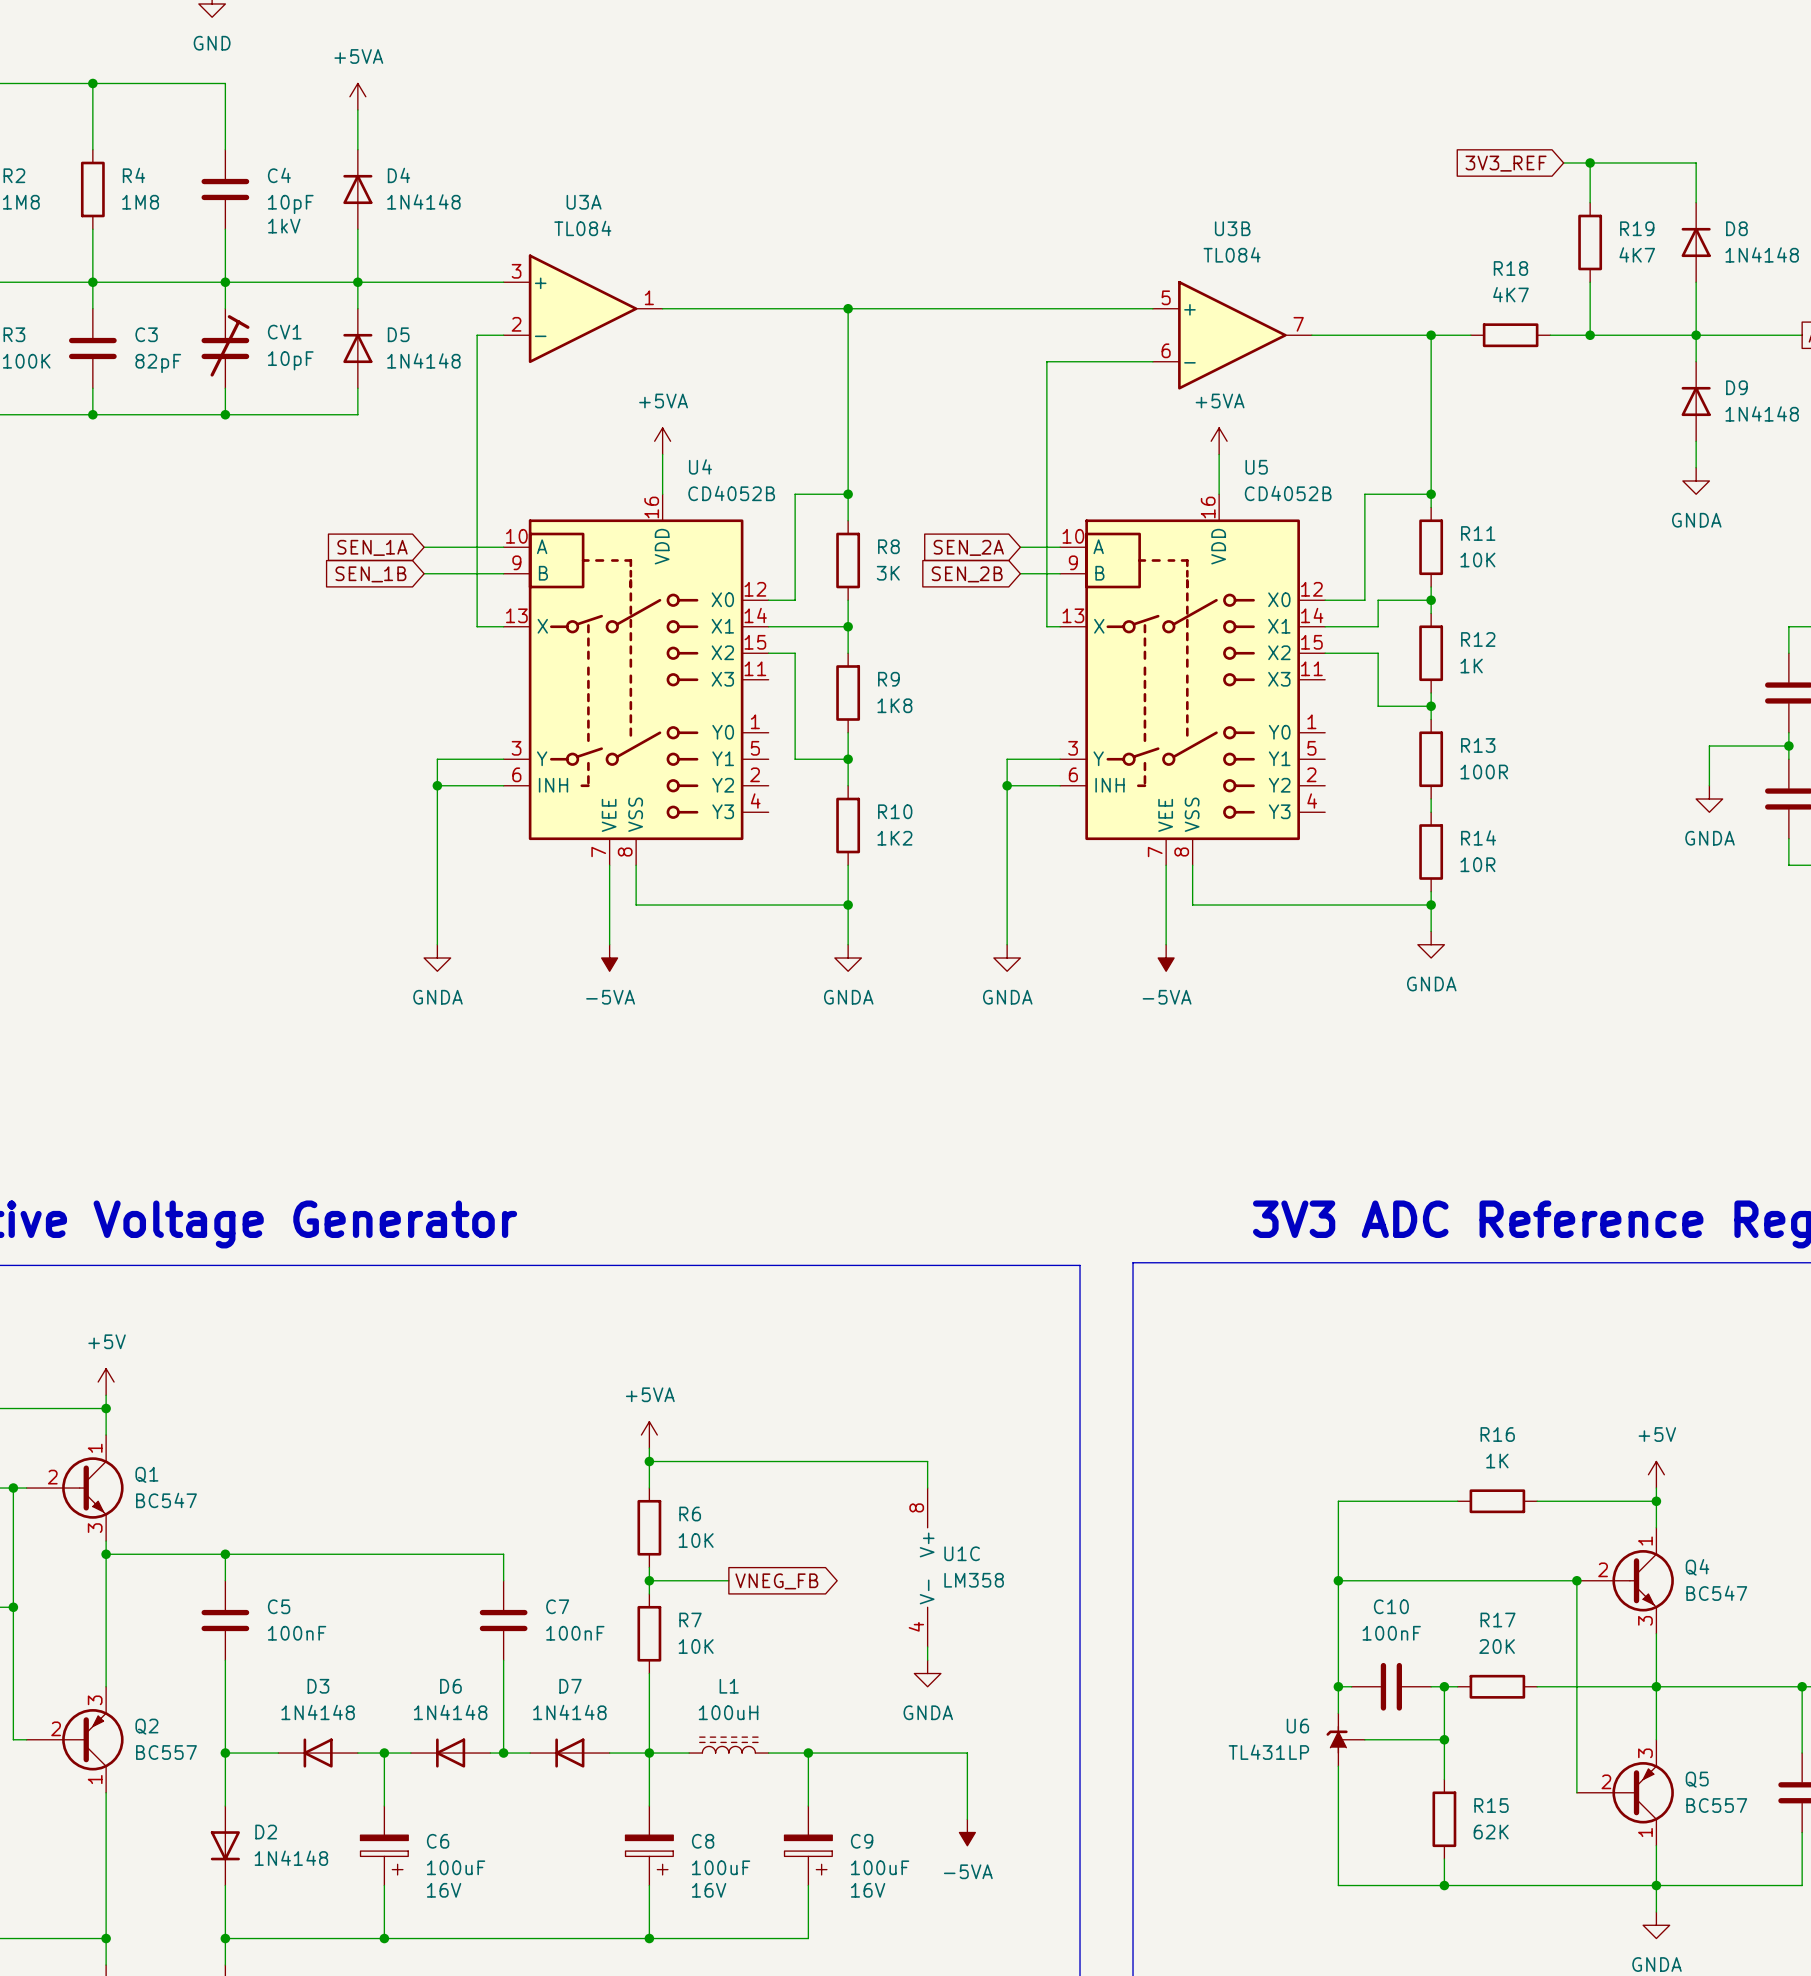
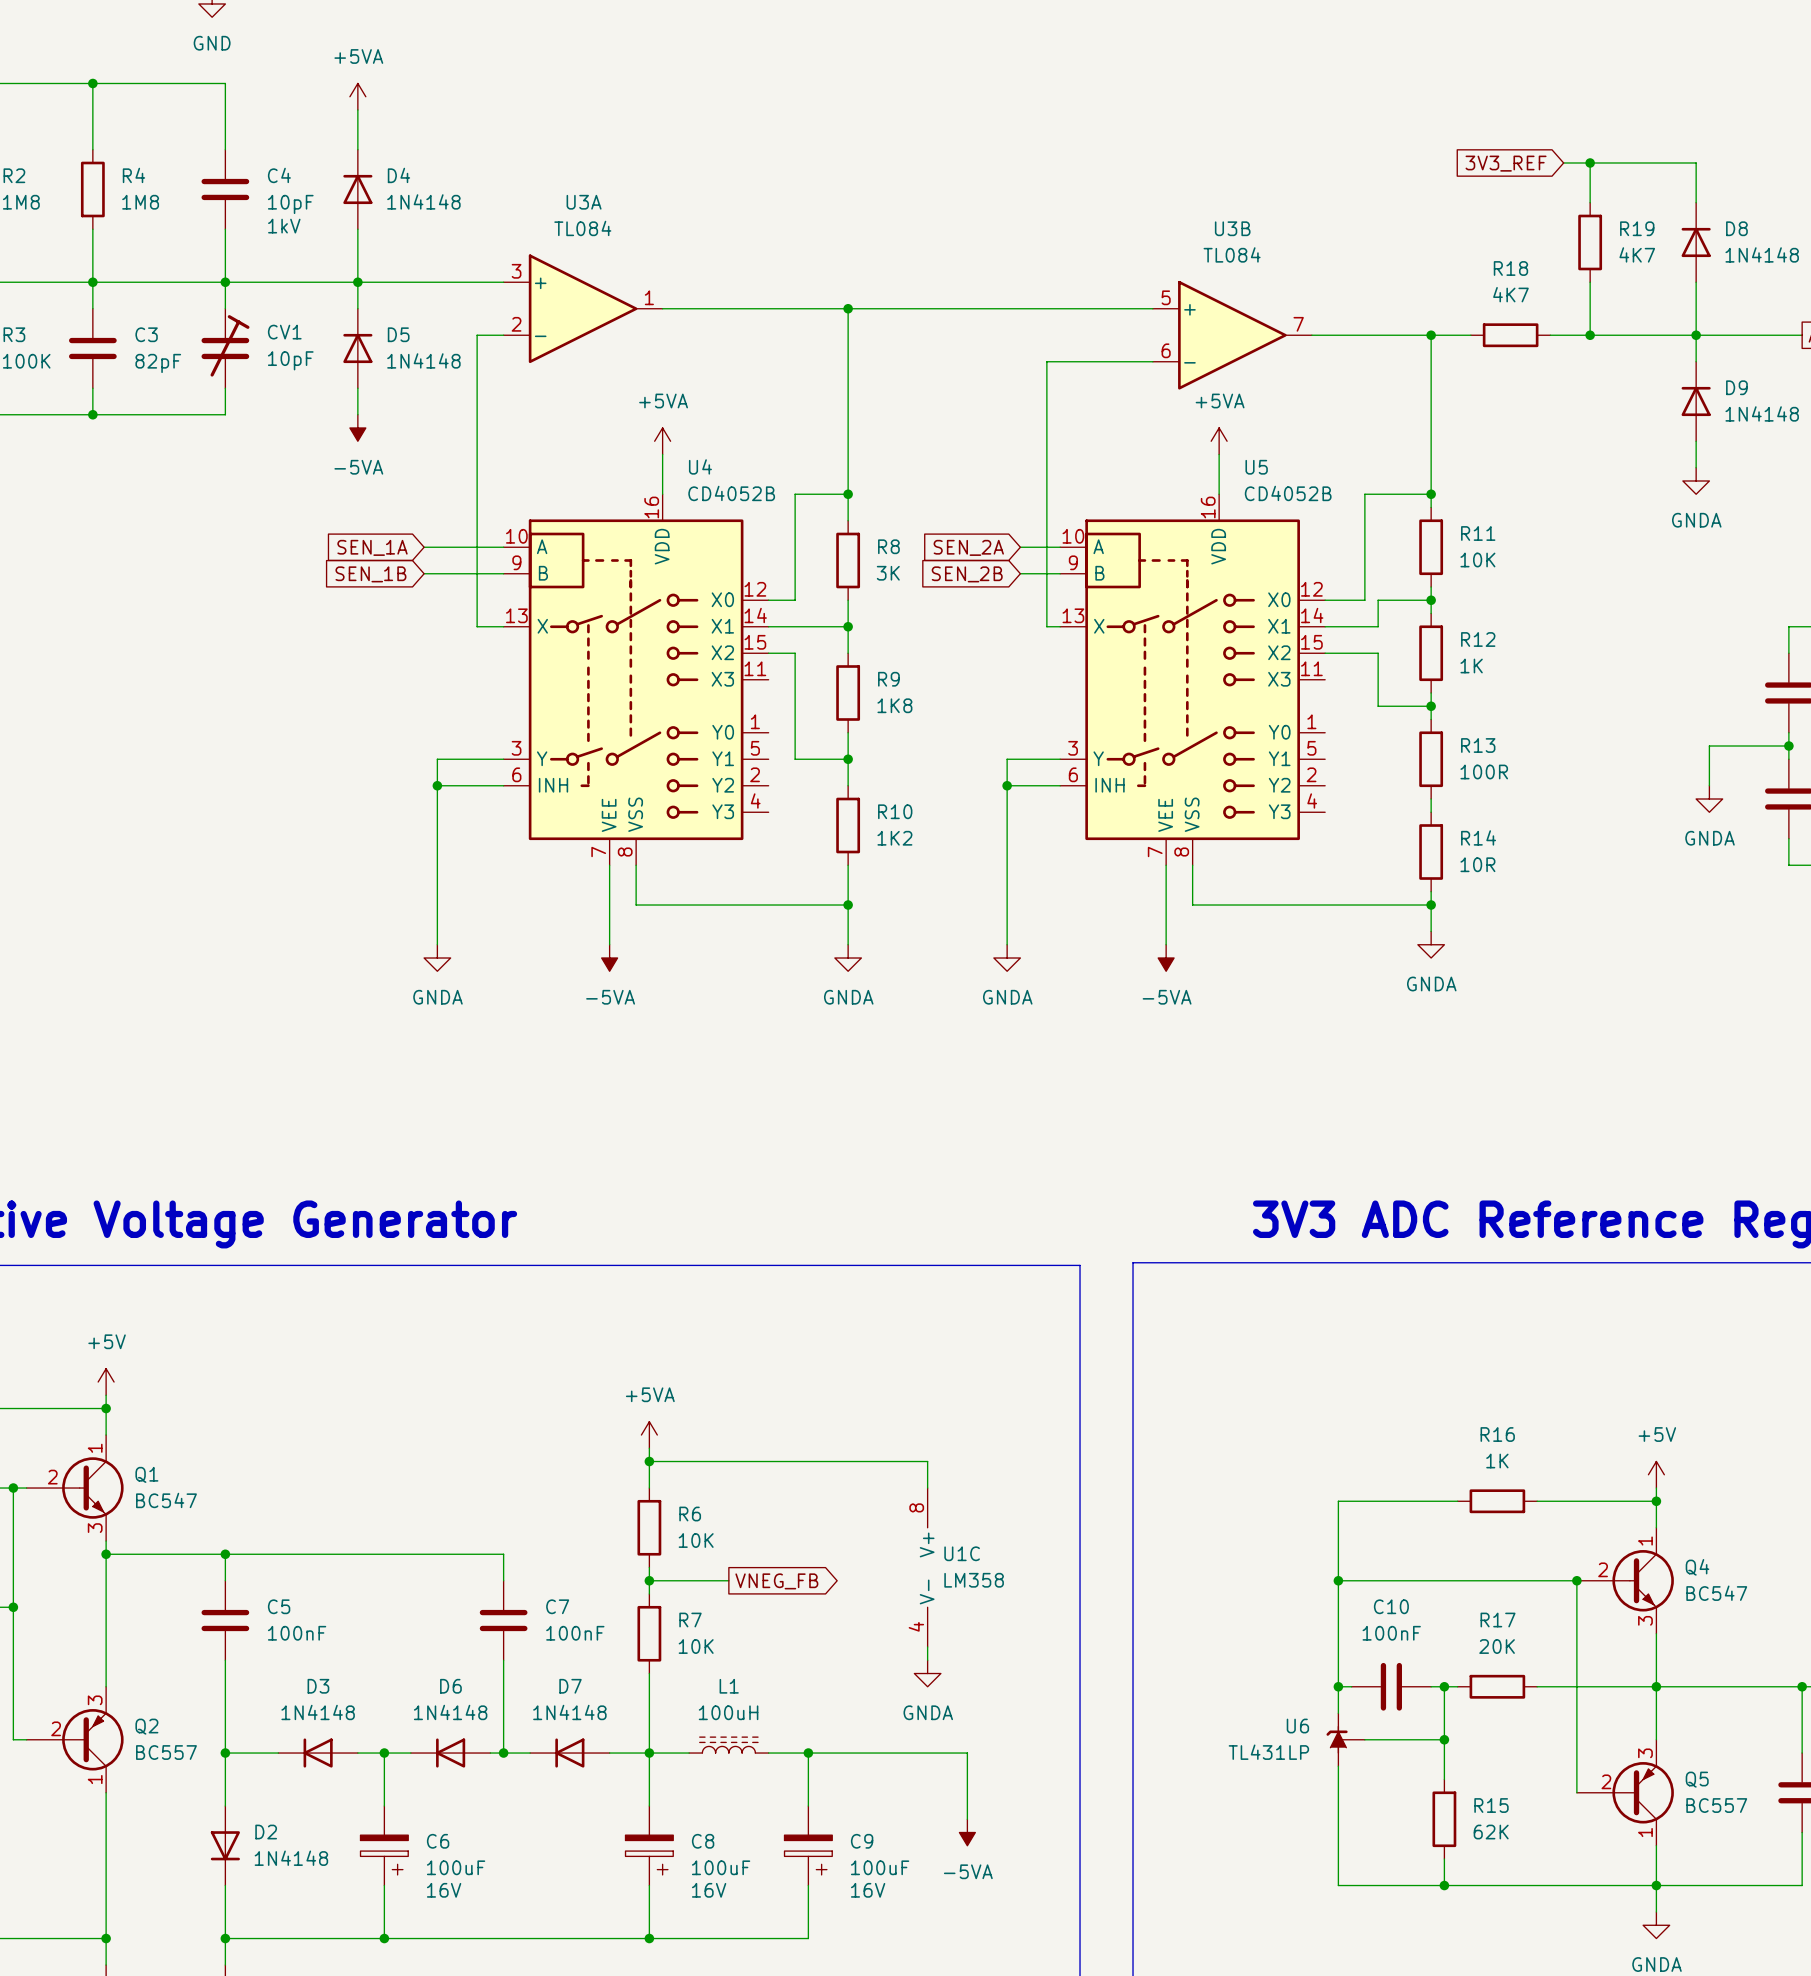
wire: (225, 414) (357, 414) -> none
junction: (225, 414) -> none
power symbol: none -> -5VA (357, 427)

